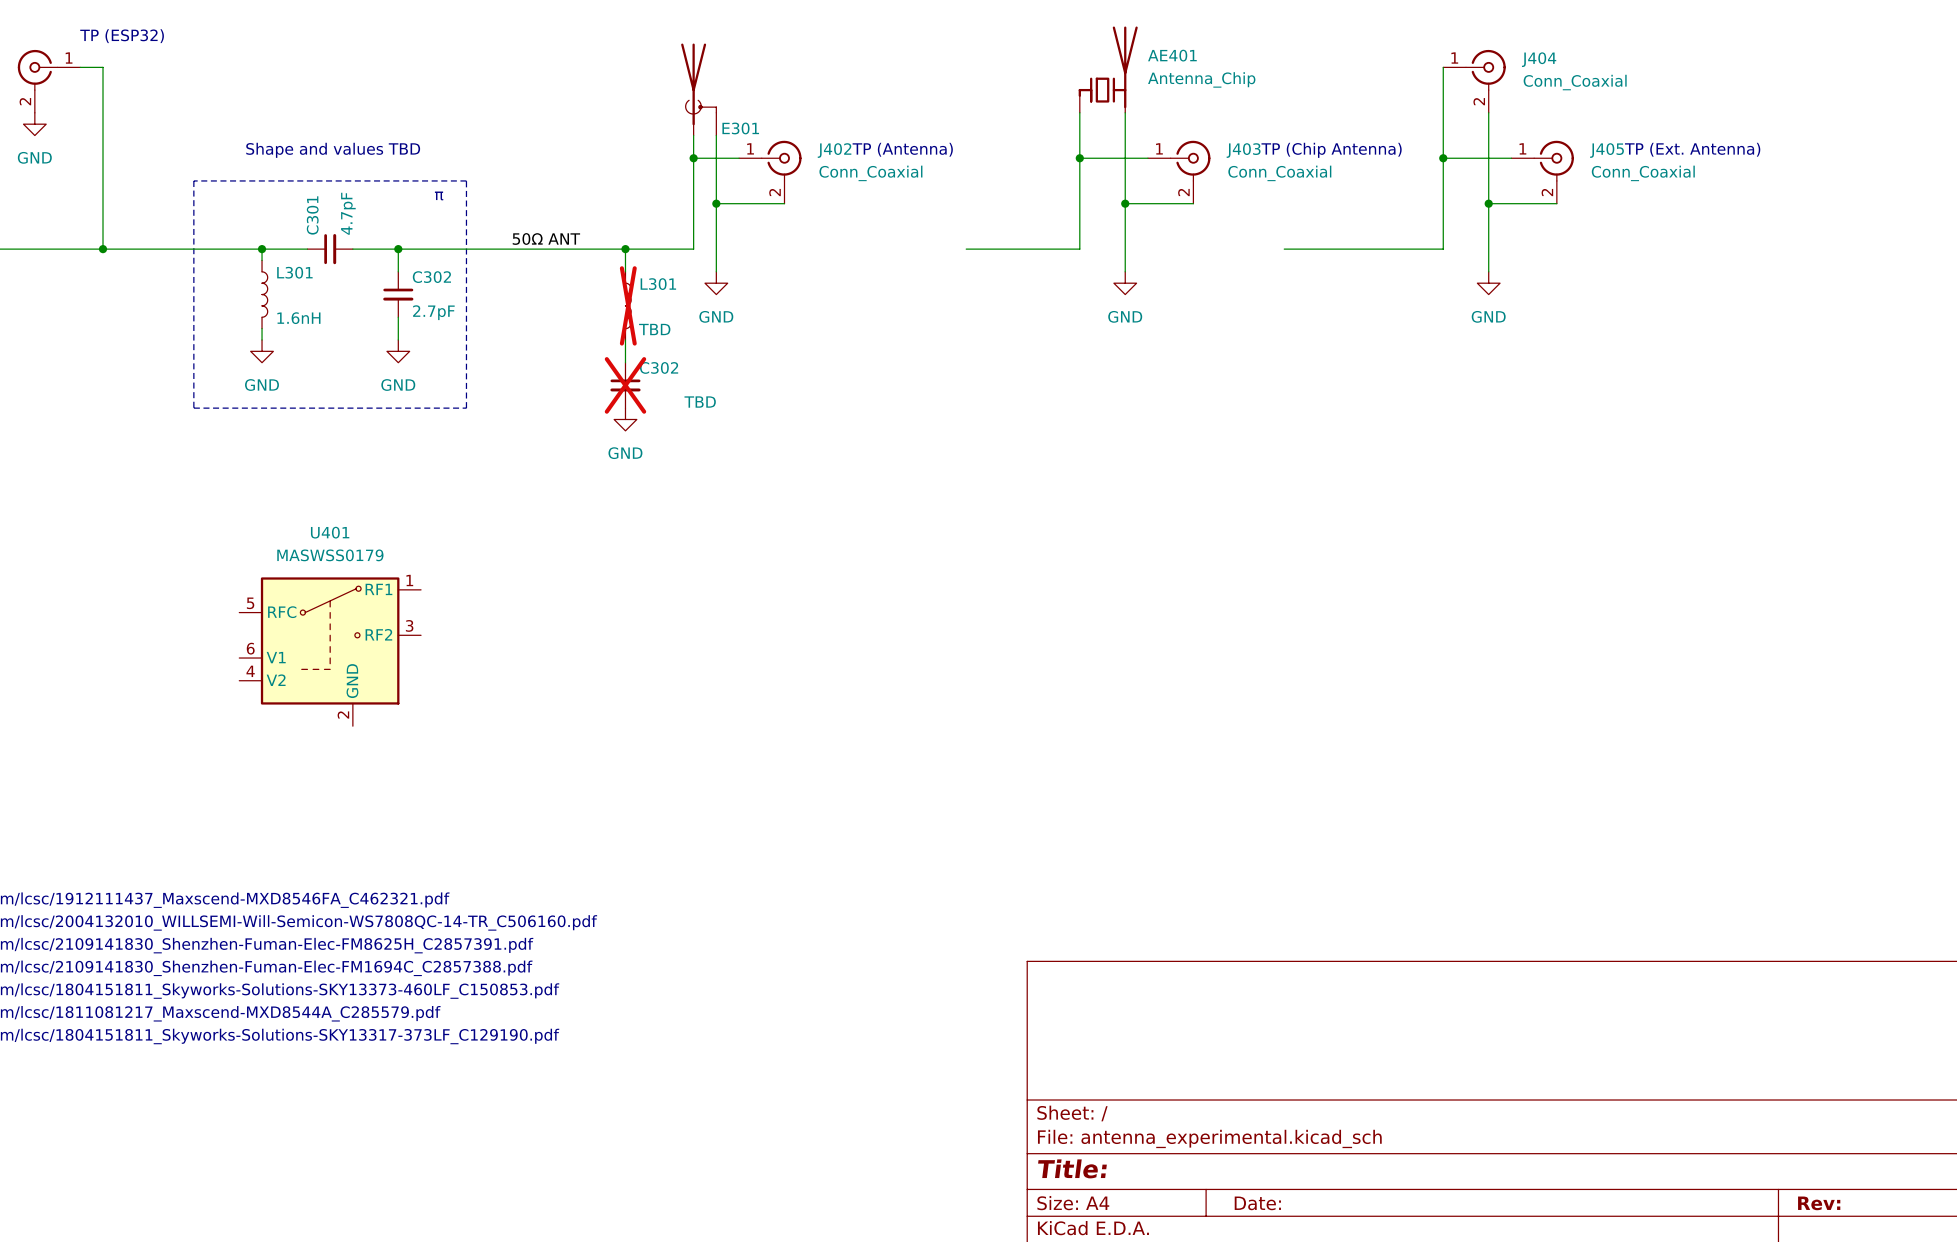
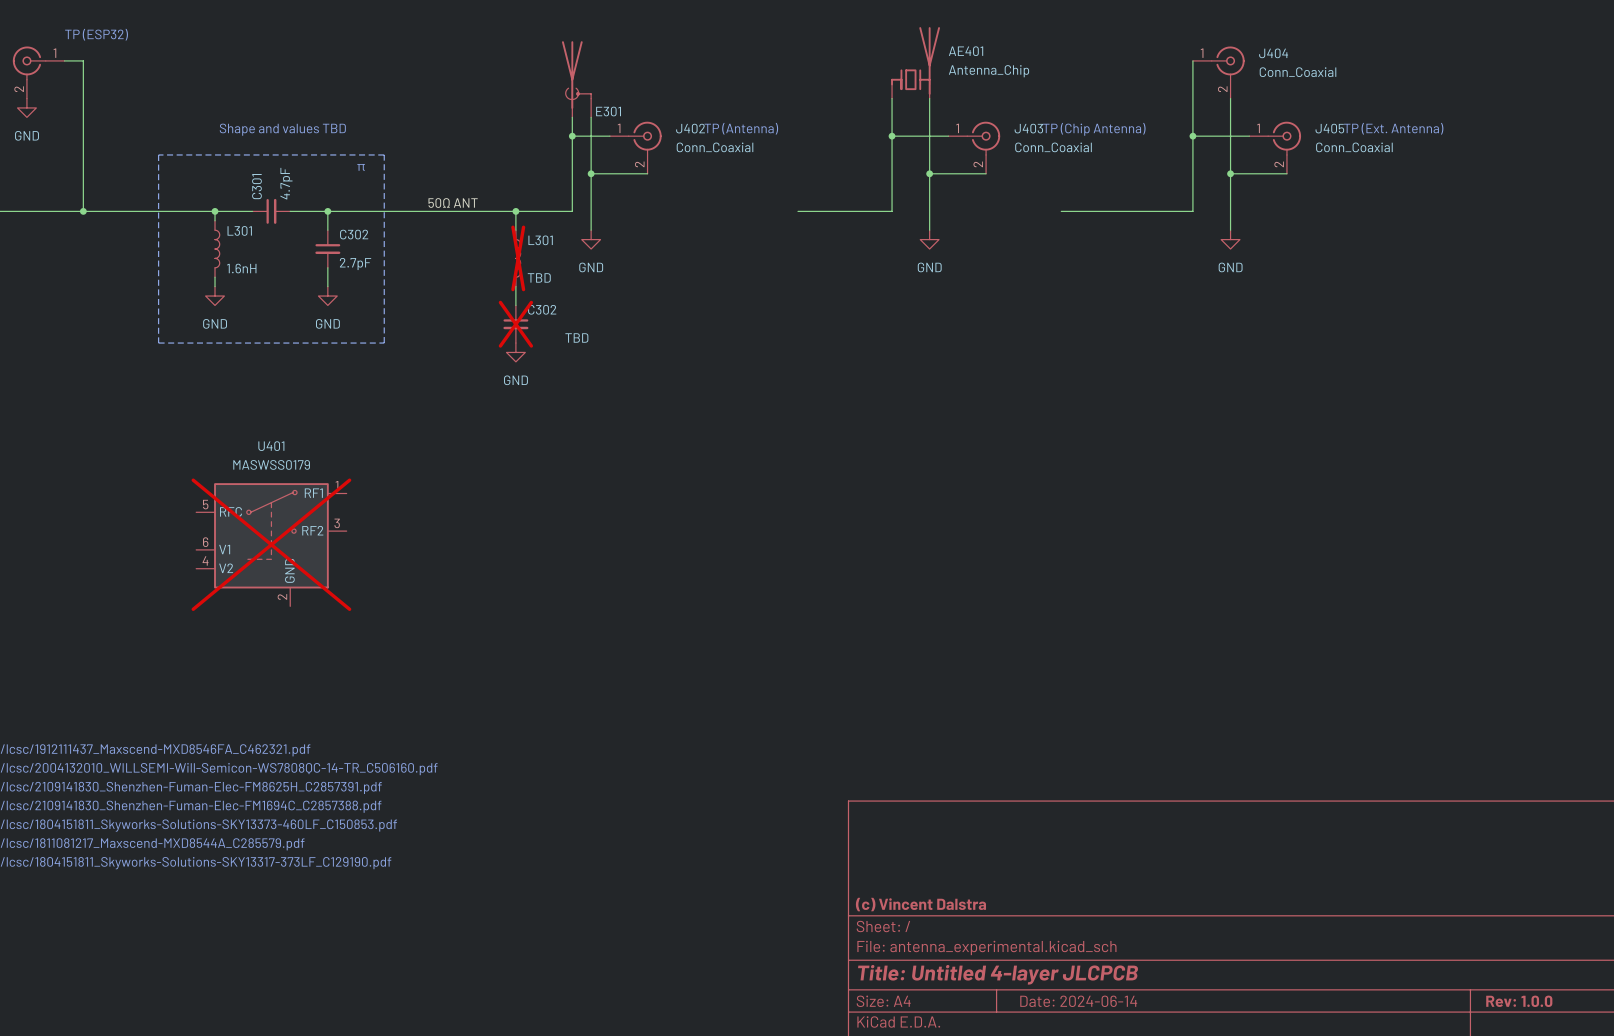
U401 do-not-place cross: none -> (271, 544)
title block: none -> (c) Vincent Dalstra (920, 904)
title block: Title: (1072, 1168) -> Title: Untitled 4-layer JLCPCB (998, 974)
title block: Date: (1257, 1203) -> Date: 2024-06-14 (1078, 1001)
title block: Rev: (1819, 1203) -> Rev: 1.0.0 (1519, 1001)

